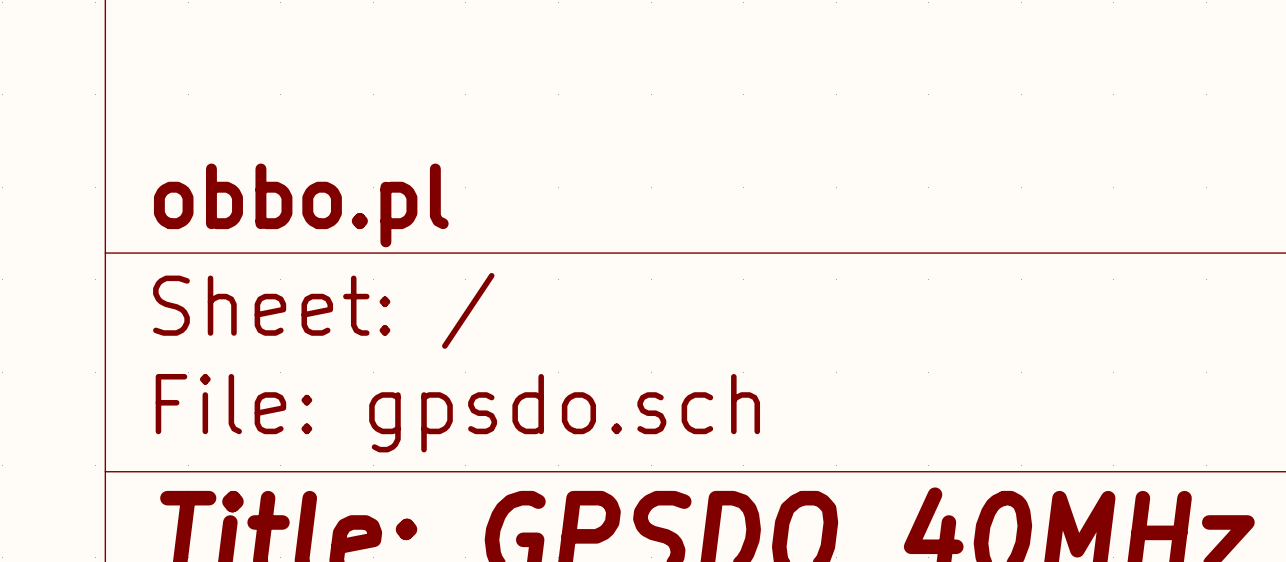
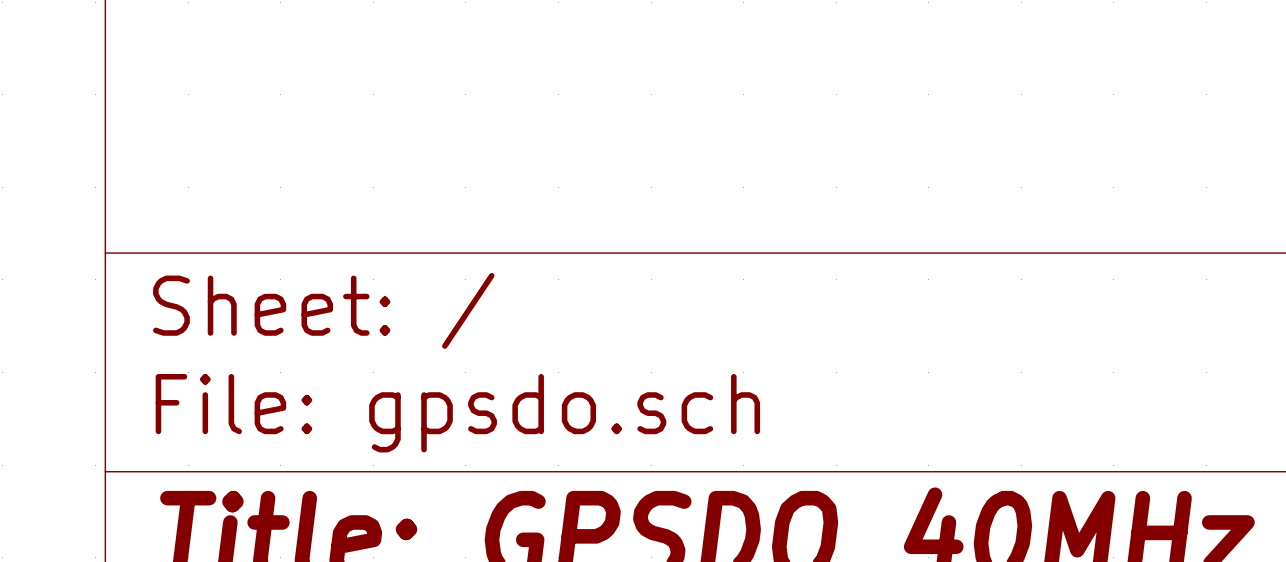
title block: obbo.pl (301, 205) -> none

